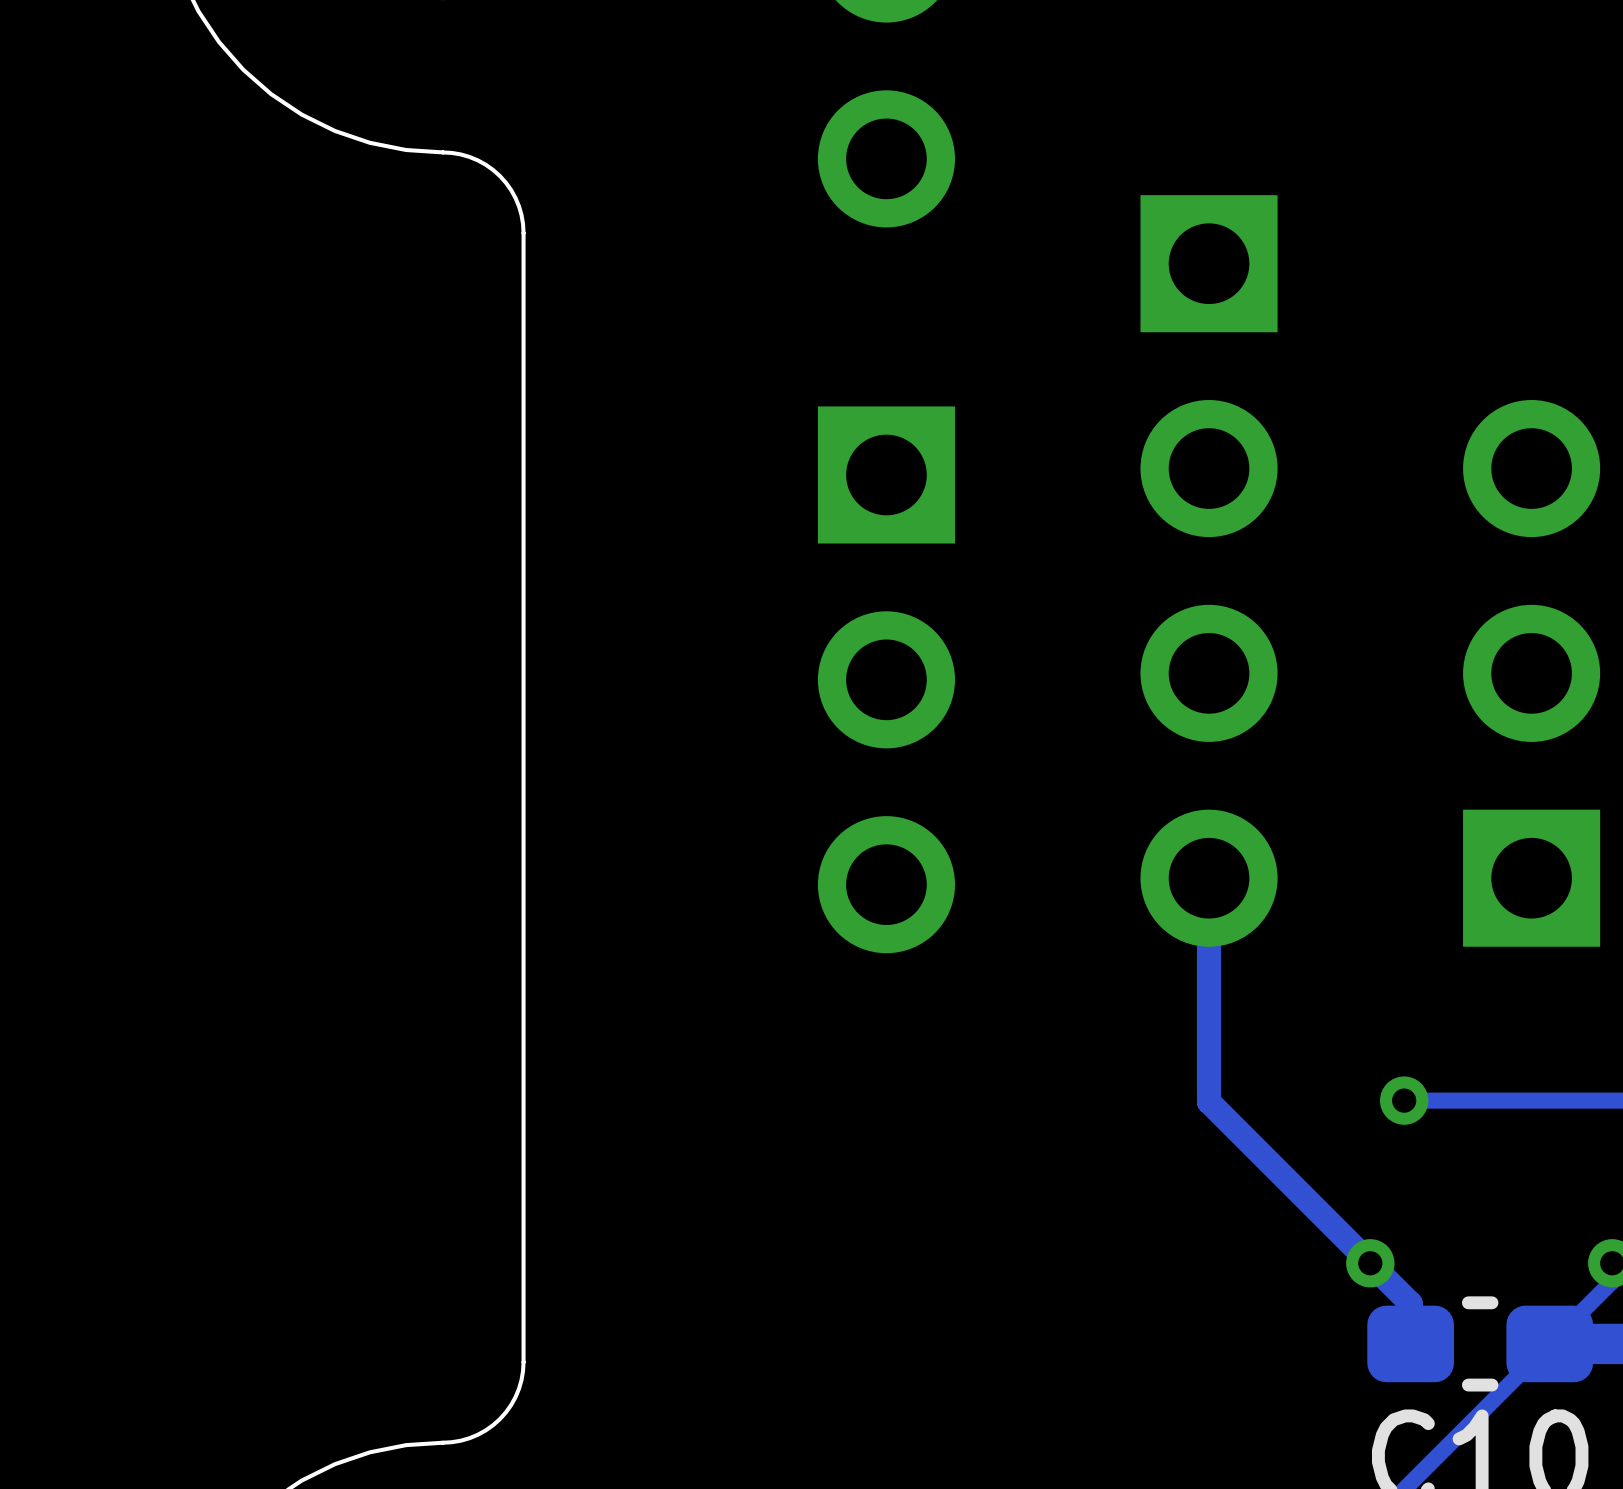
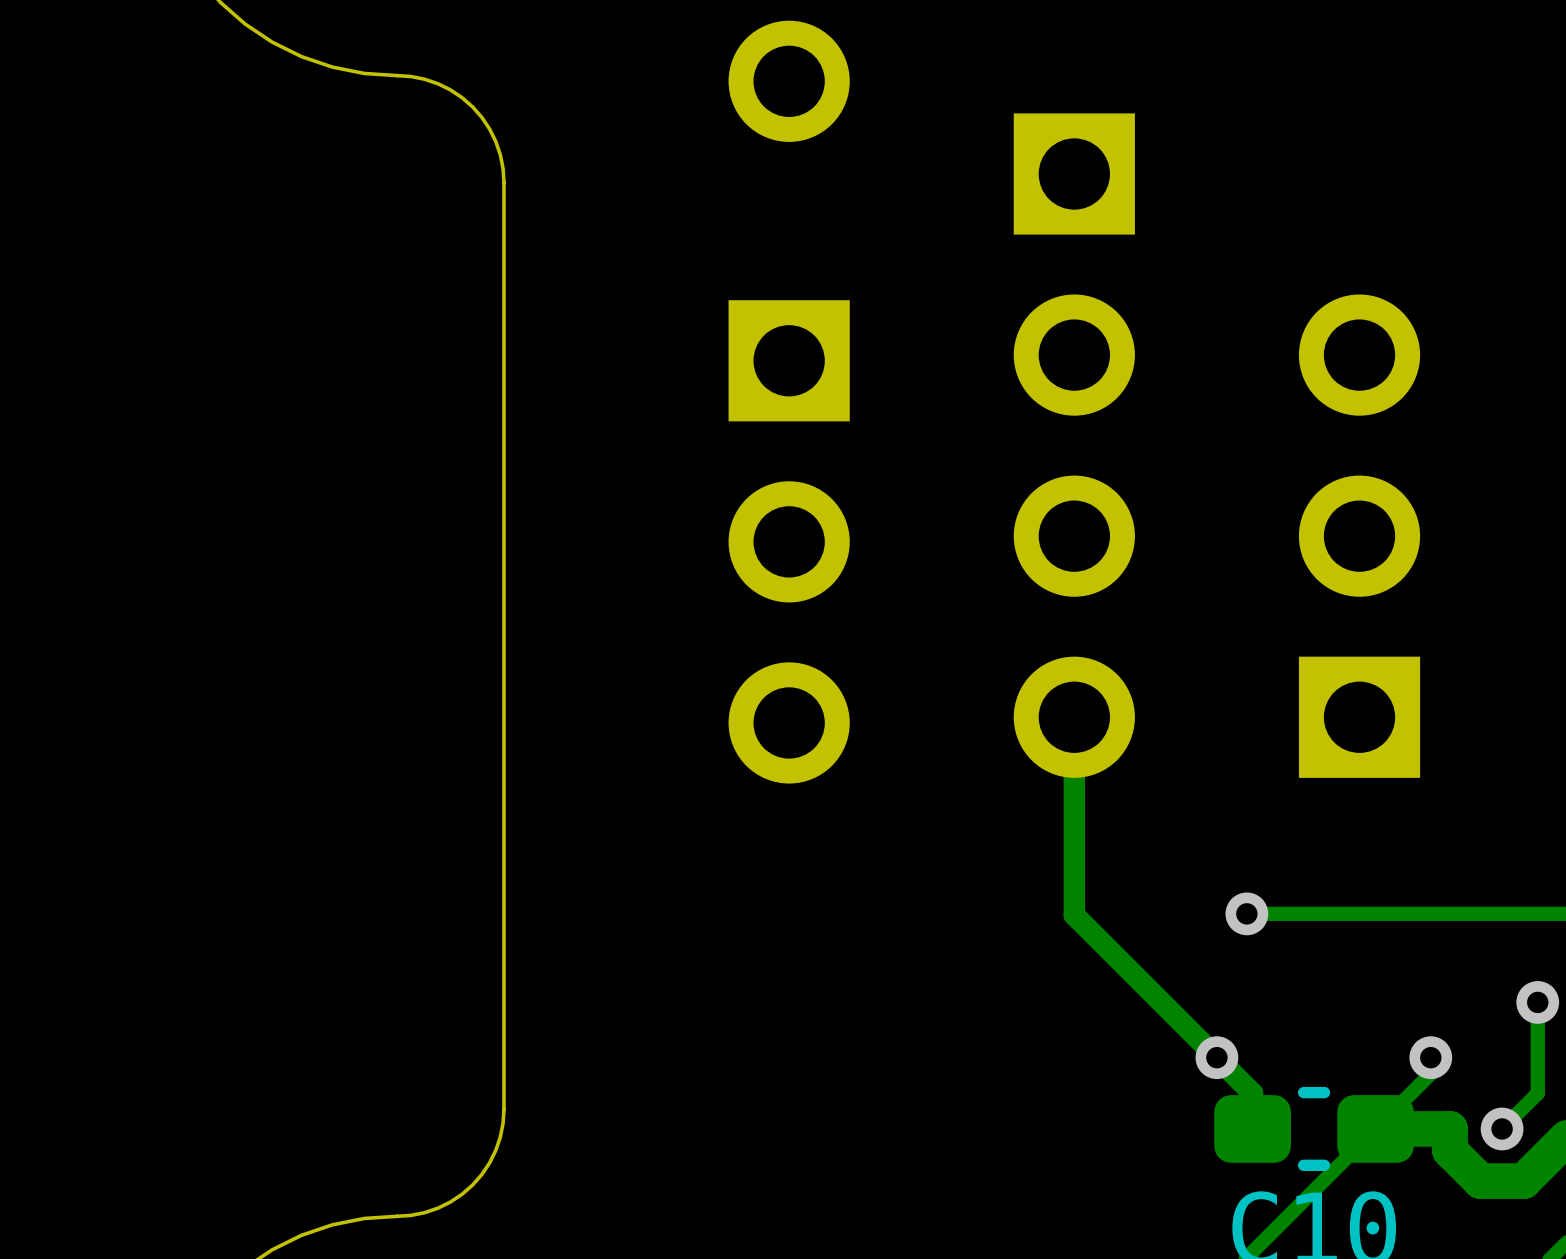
board edge: (442, 152) (460, 154) (477, 160) (499, 176) (511, 190) (519, 206) (523, 233) (523, 1371) (515, 1397) (499, 1419) (485, 1430) (469, 1438) (442, 1442) -> (397, 75) (411, 76) (437, 83) (450, 89) (472, 106) (489, 129) (495, 141) (503, 168) (503, 182) (503, 1123) (495, 1150) (489, 1162) (472, 1184) (462, 1194) (437, 1208) (424, 1212) (397, 1216)

